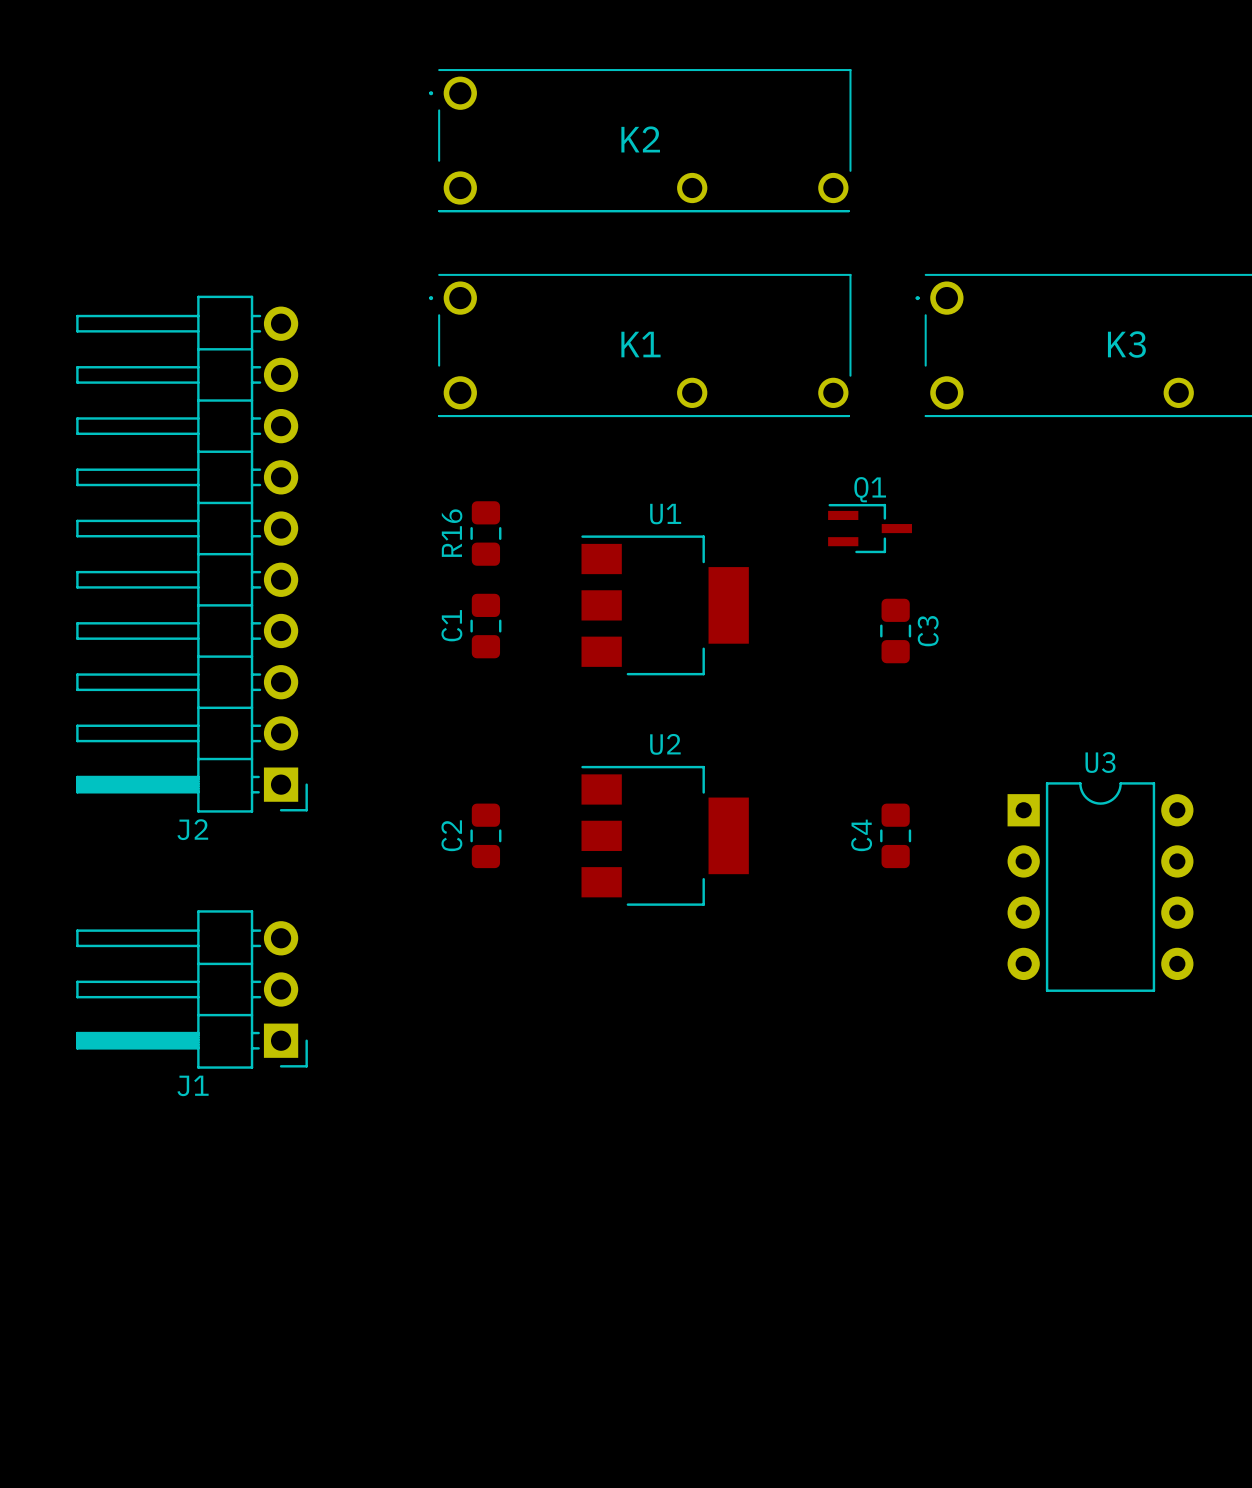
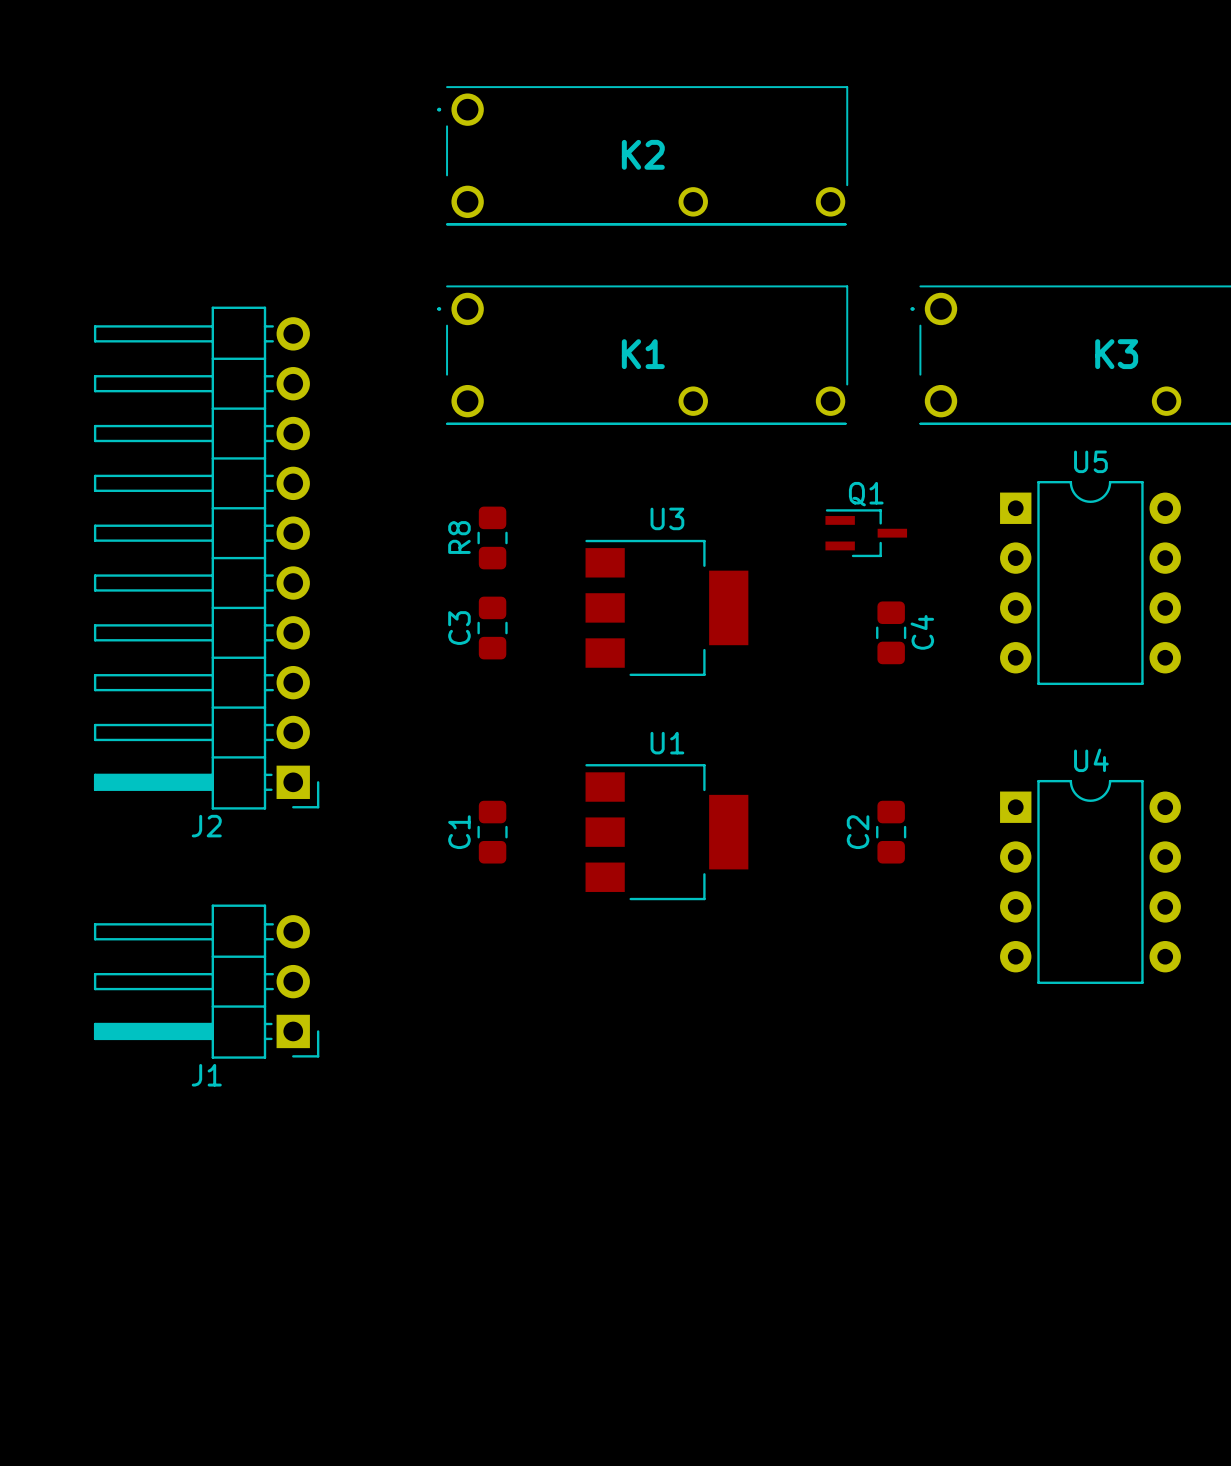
U1 name: U1 (665, 514) -> U3 (667, 518)
R16 name: R16 (452, 533) -> R8 (459, 537)
U5: none -> (1090, 583)
C1 name: C1 (451, 625) -> C3 (459, 628)
C3 name: C3 (928, 631) -> C4 (922, 632)
U2 name: U2 (665, 744) -> U1 (667, 743)
U3 name: U3 (1100, 762) -> U4 (1091, 760)
C2 name: C2 (451, 835) -> C1 (459, 832)
C4 name: C4 (861, 835) -> C2 (858, 832)

